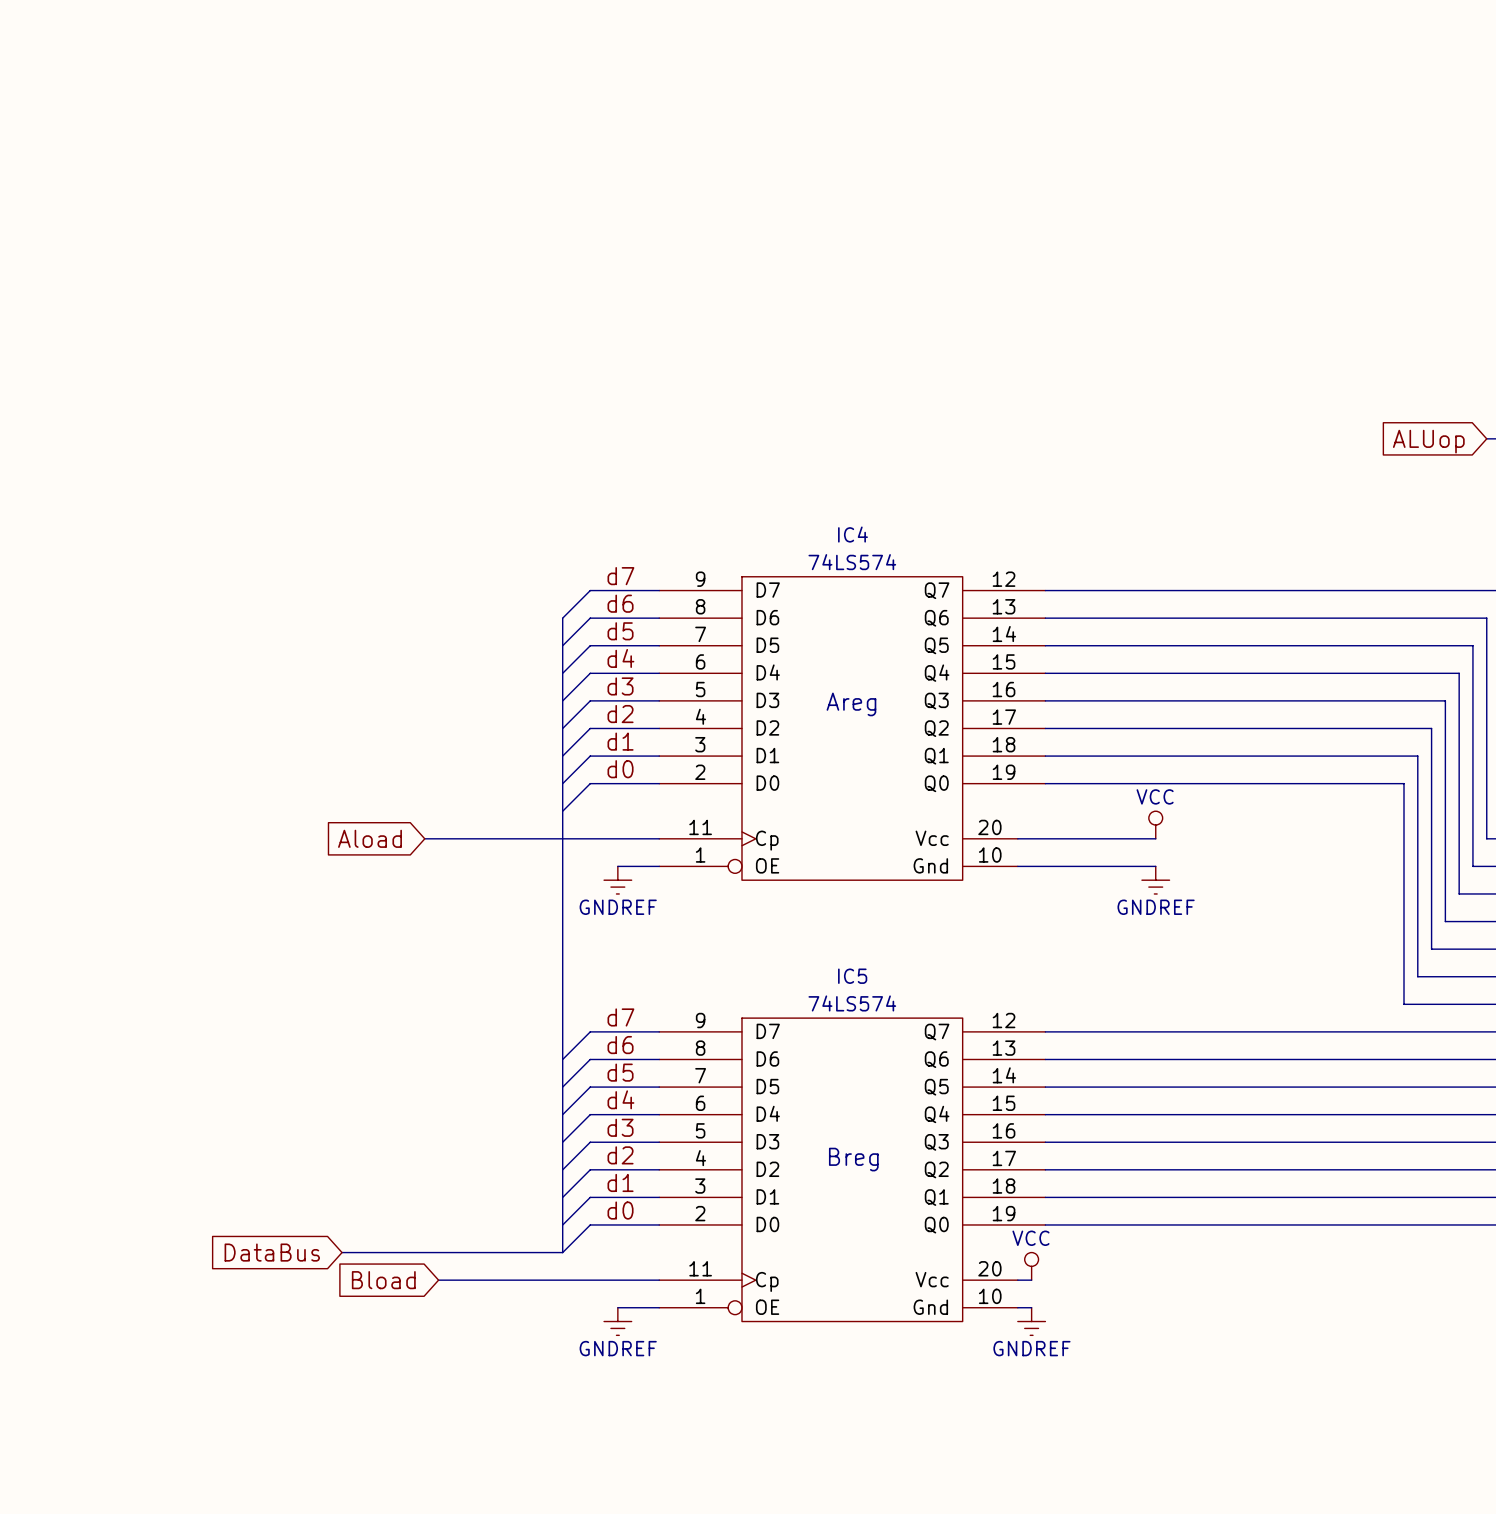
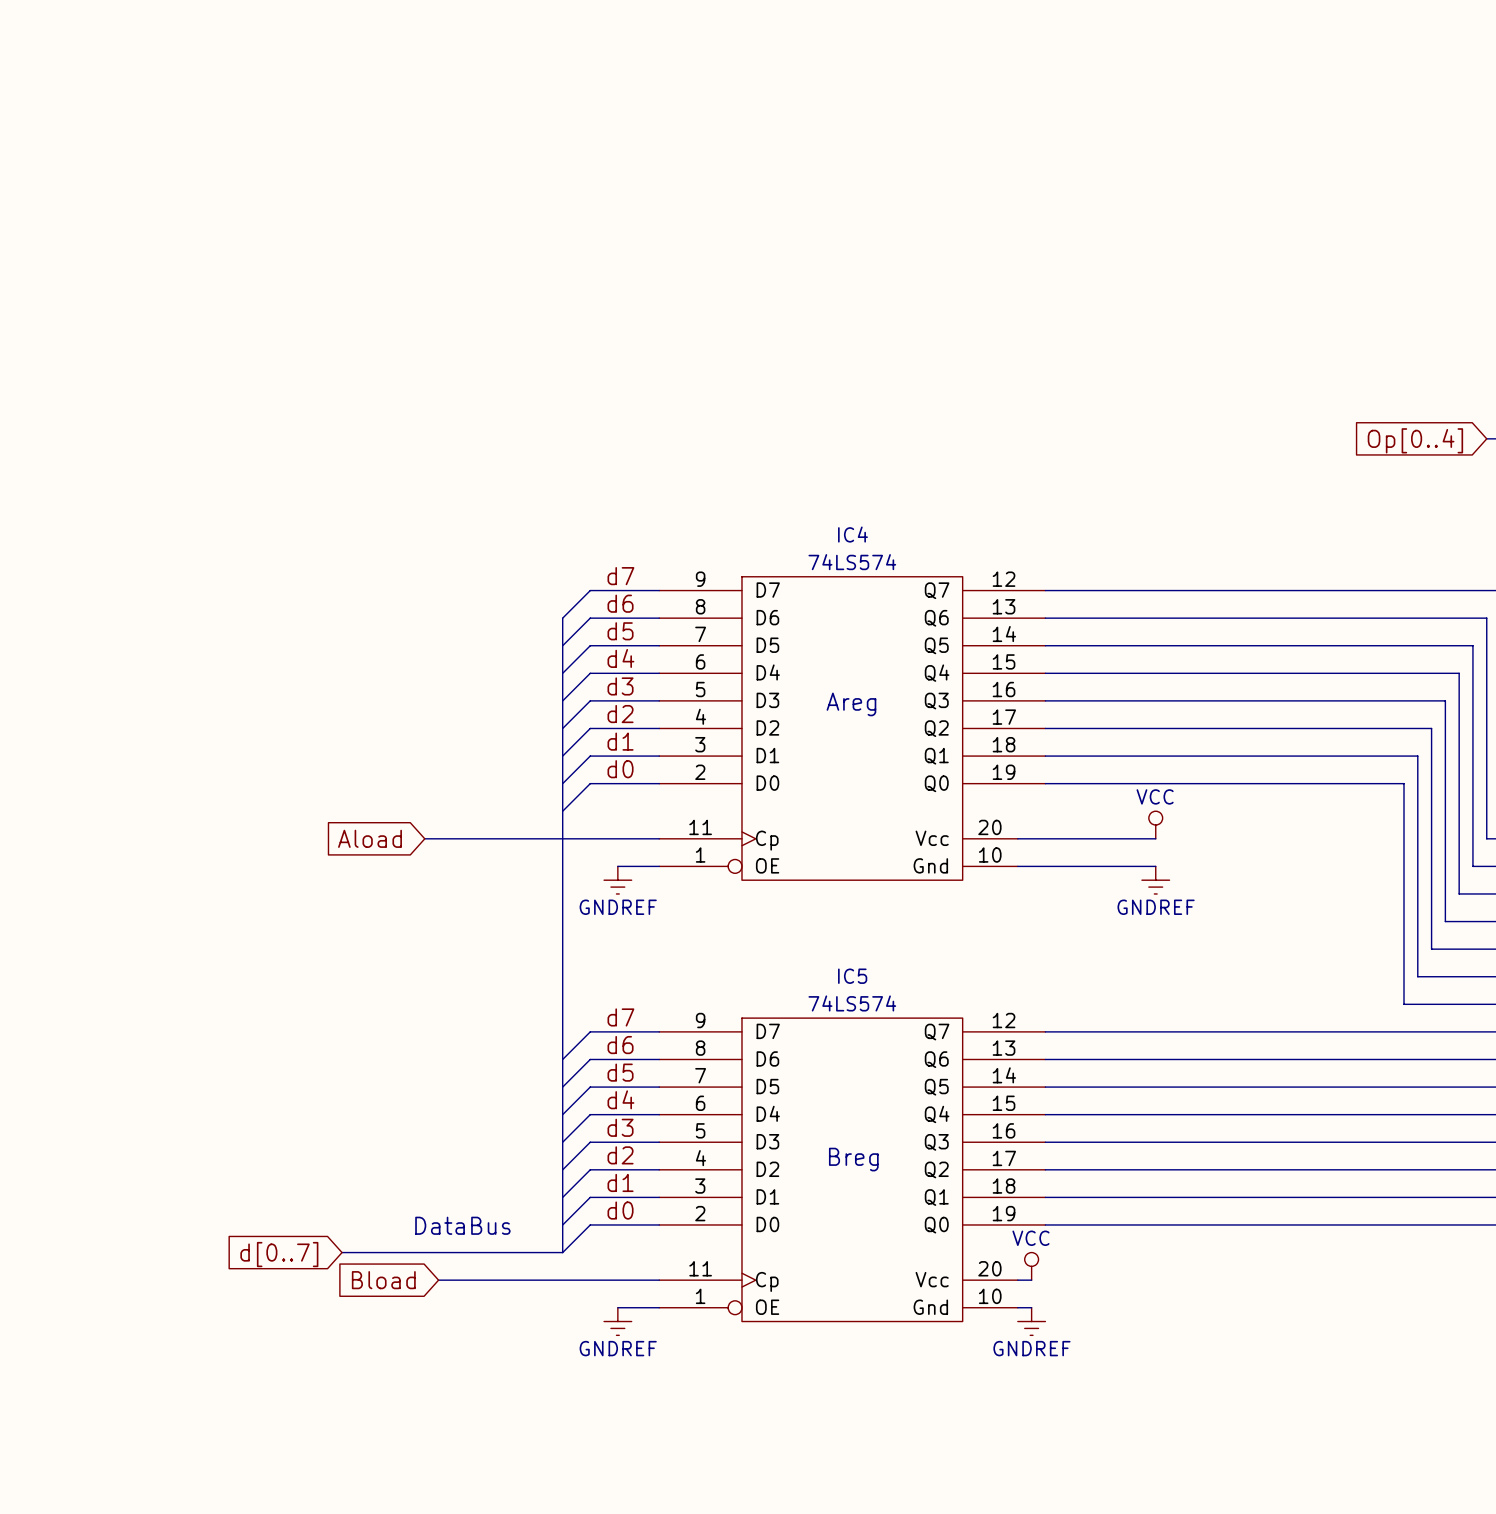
global label: ALUop (1428, 441) -> Op[0..4] (1415, 440)
text: none -> DataBus (462, 1225)
global label: DataBus (272, 1252) -> d[0..7] (279, 1254)

